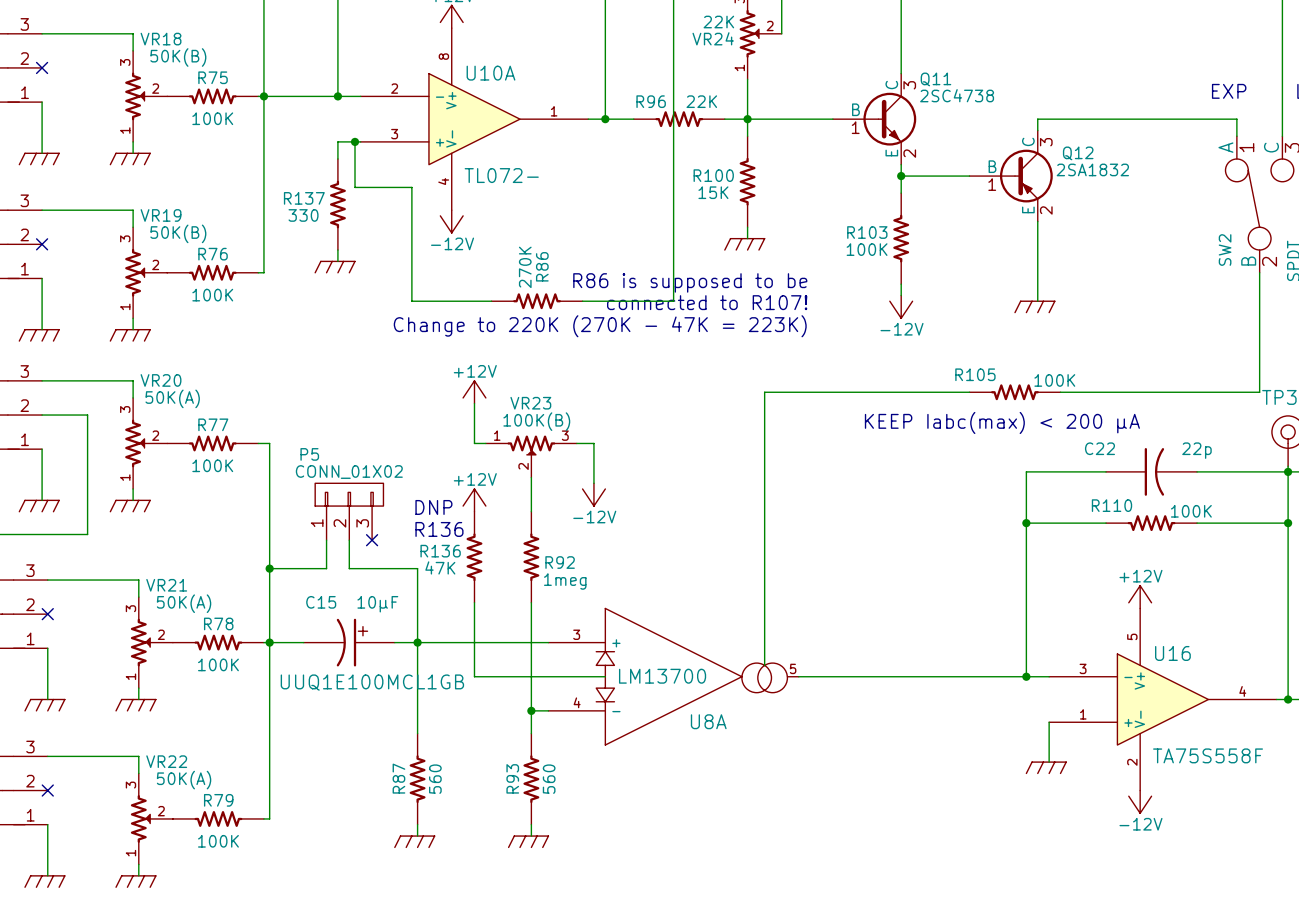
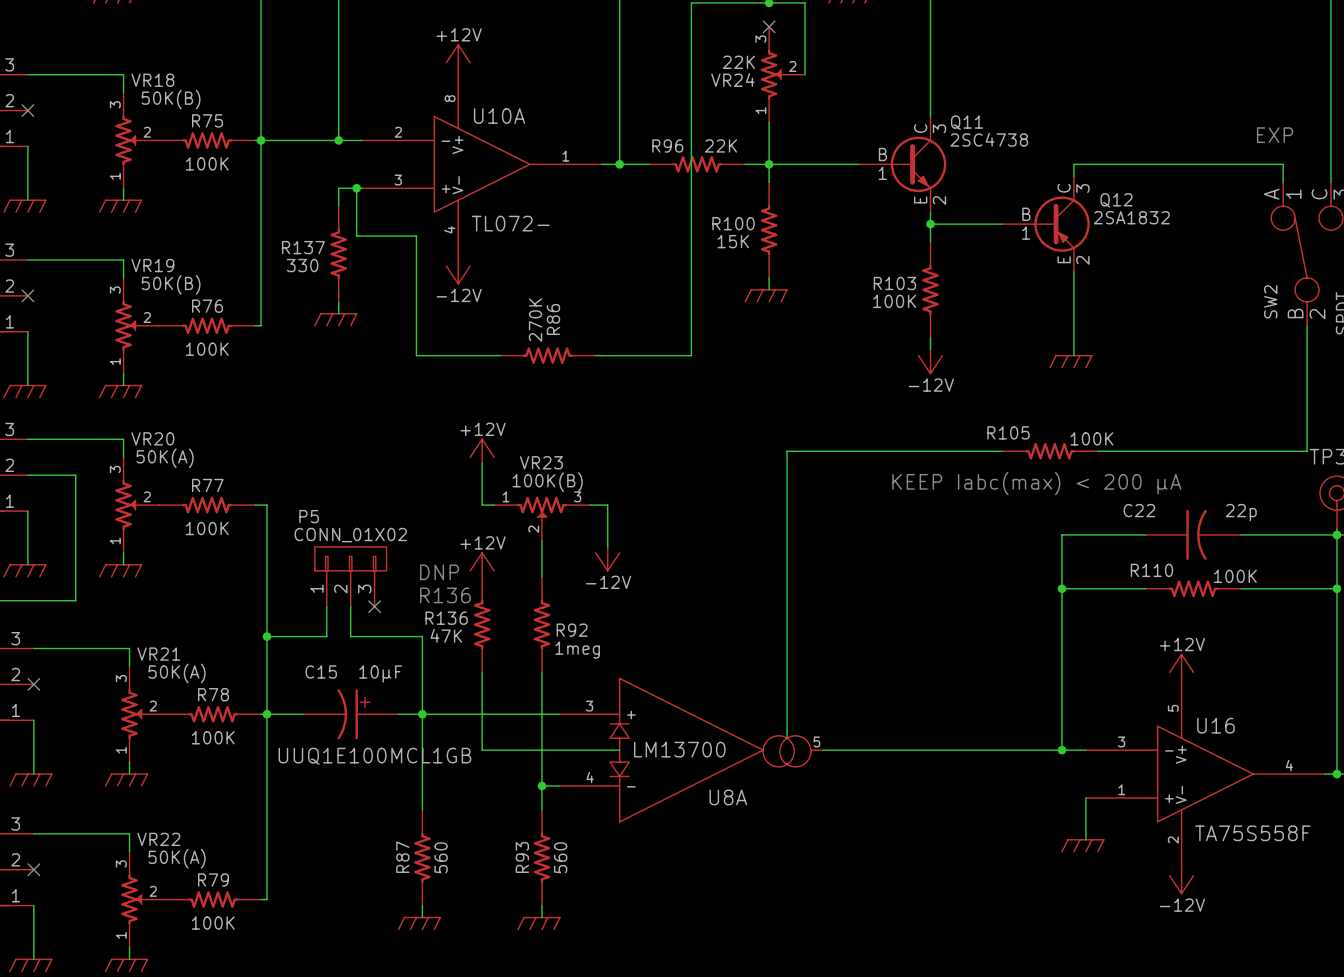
text: R86 is supposed to be (690, 282) -> none
text: connected to R107! (707, 302) -> none
text: Change to 220K (270K - 47K = 223K) (600, 326) -> none

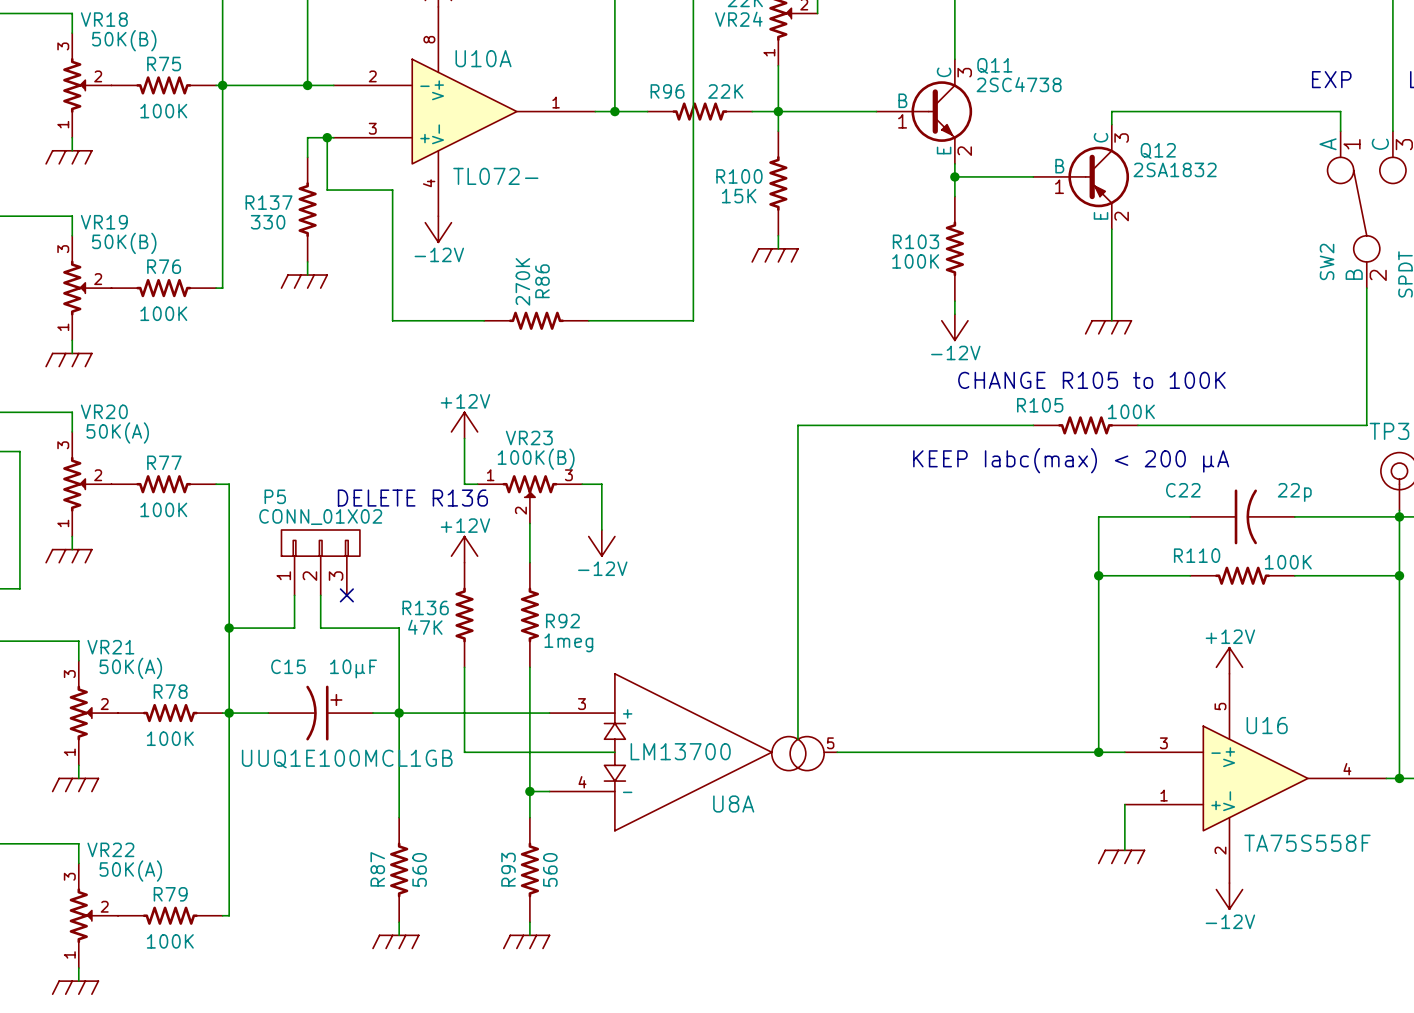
text: none -> CHANGE R105 to 100K (1091, 380)
text: none -> DELETE R136 (412, 498)
text: DNP (439, 572) -> none
text: R136 (445, 595) -> none

